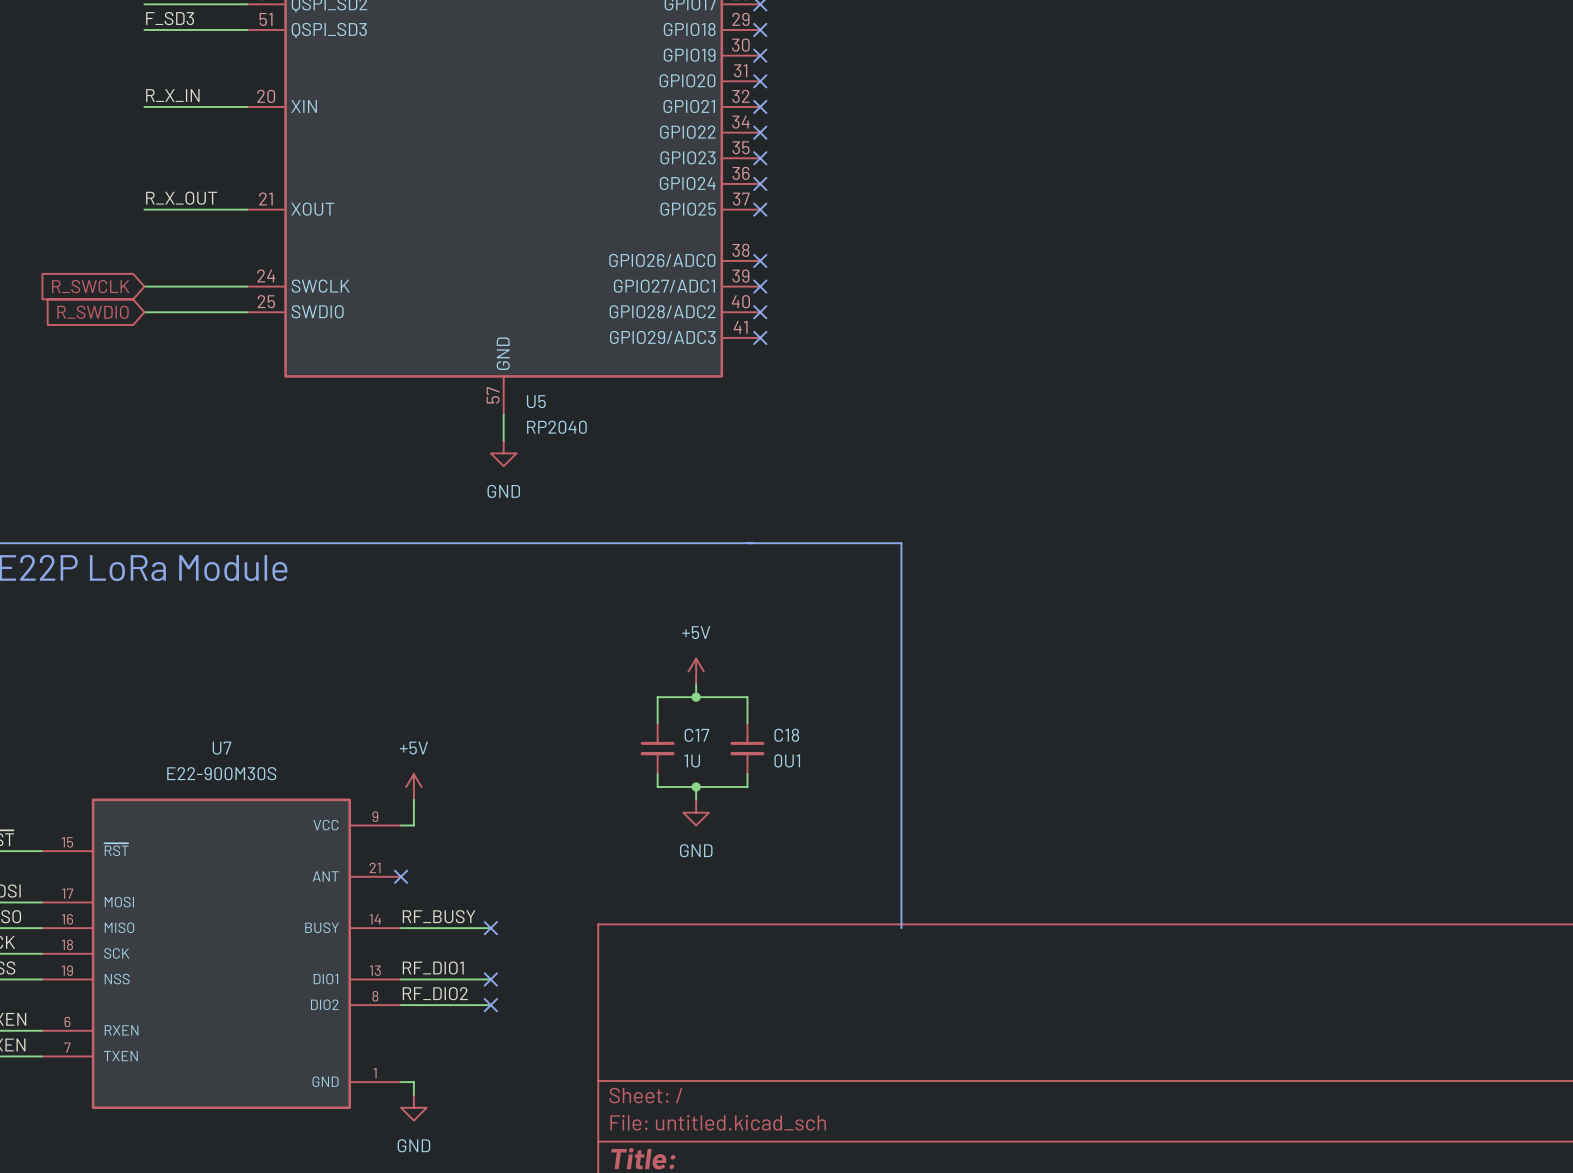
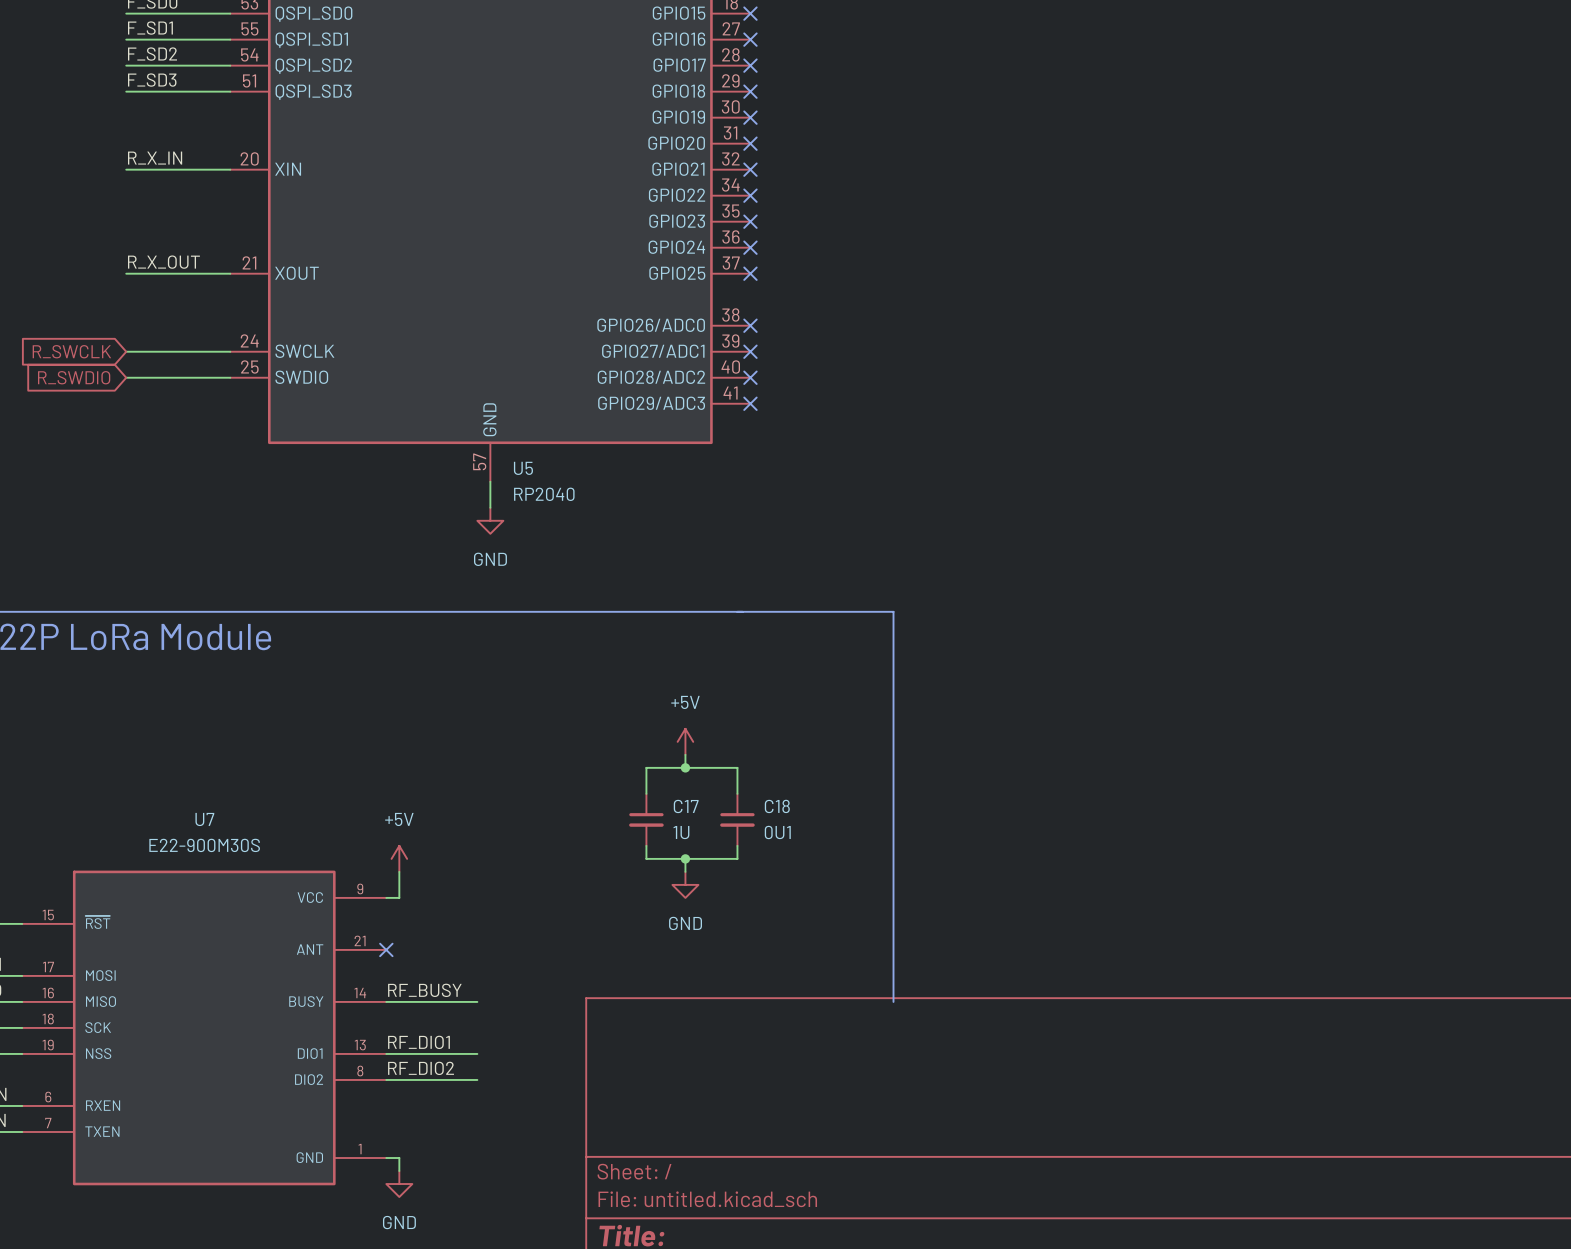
no-connect mark: (490, 928) -> none
no-connect mark: (490, 979) -> none
no-connect mark: (490, 1005) -> none

